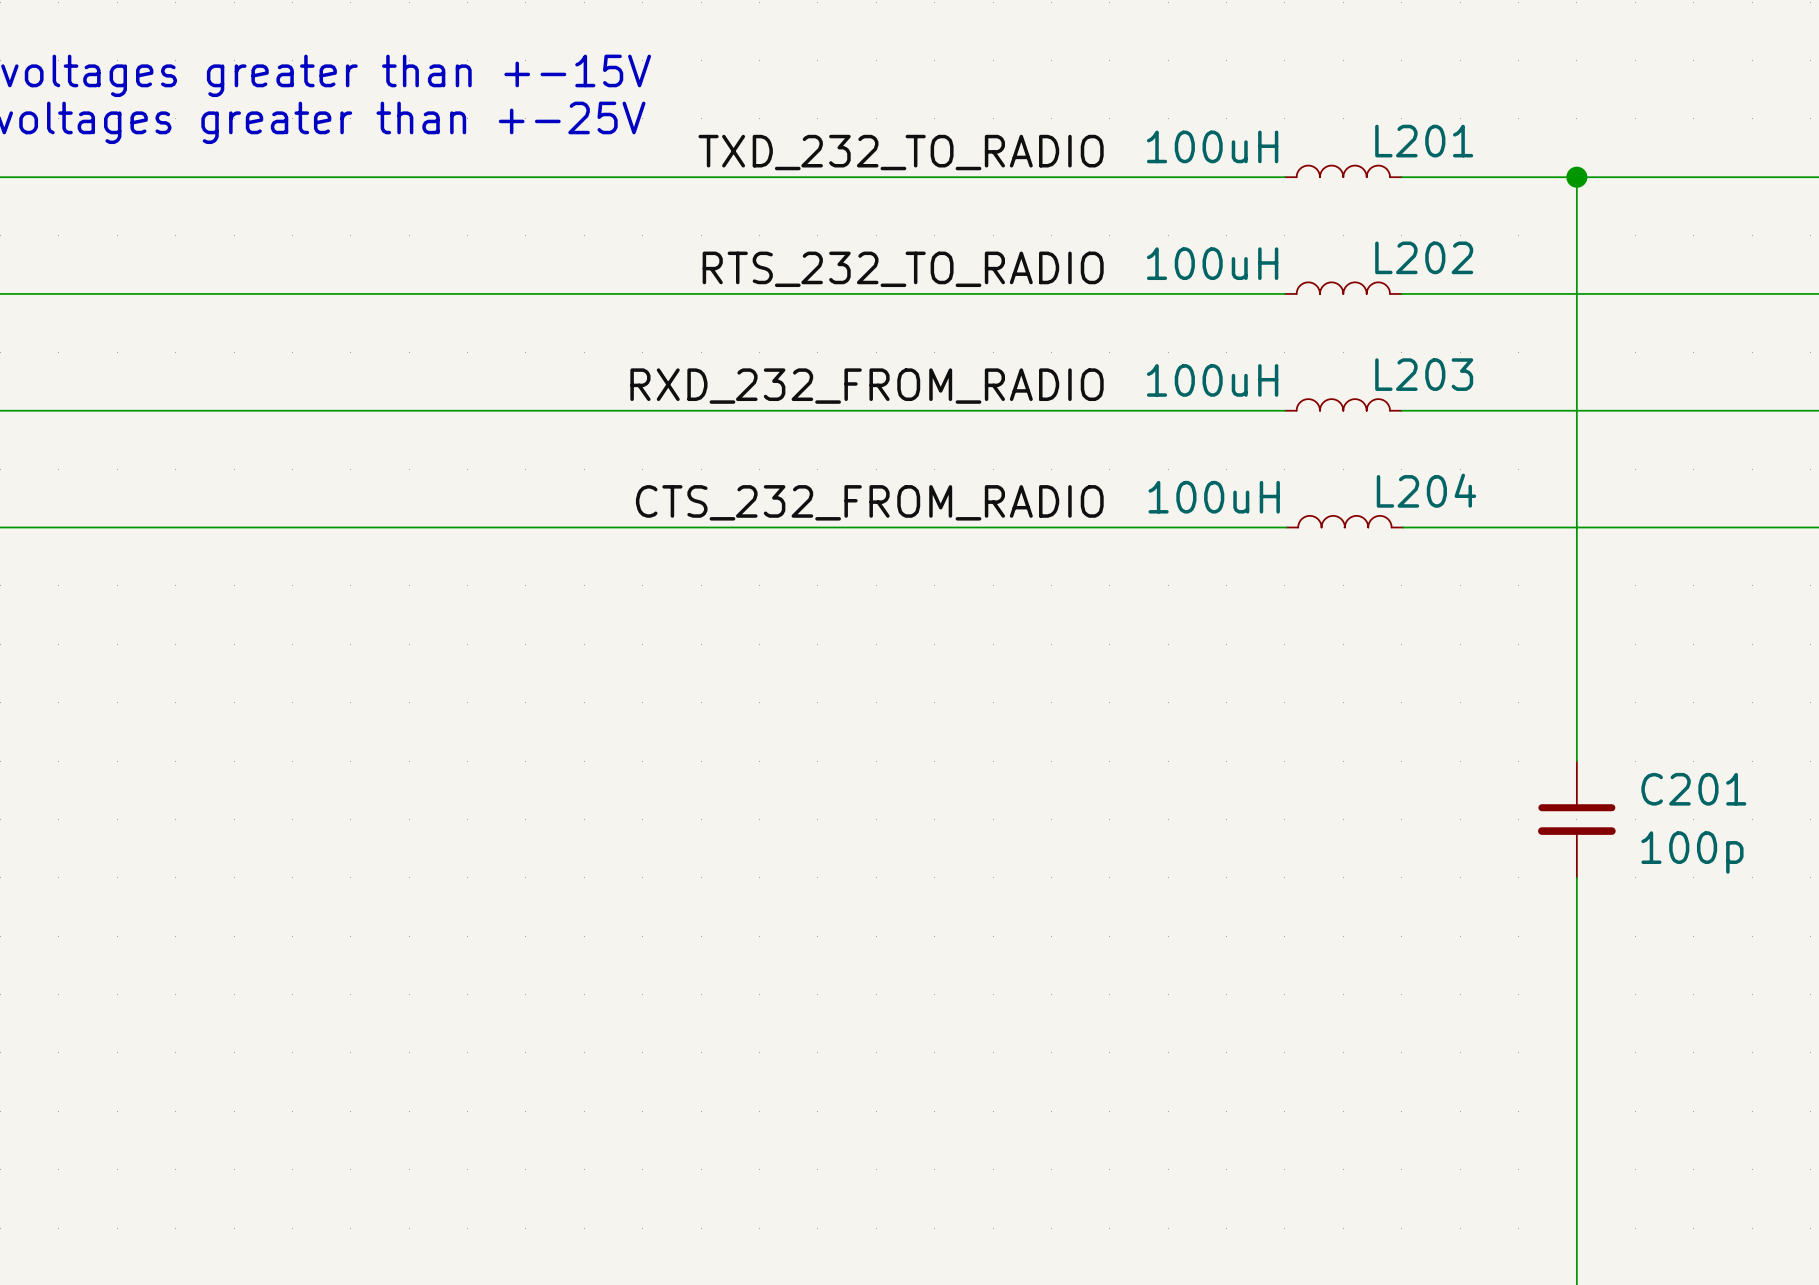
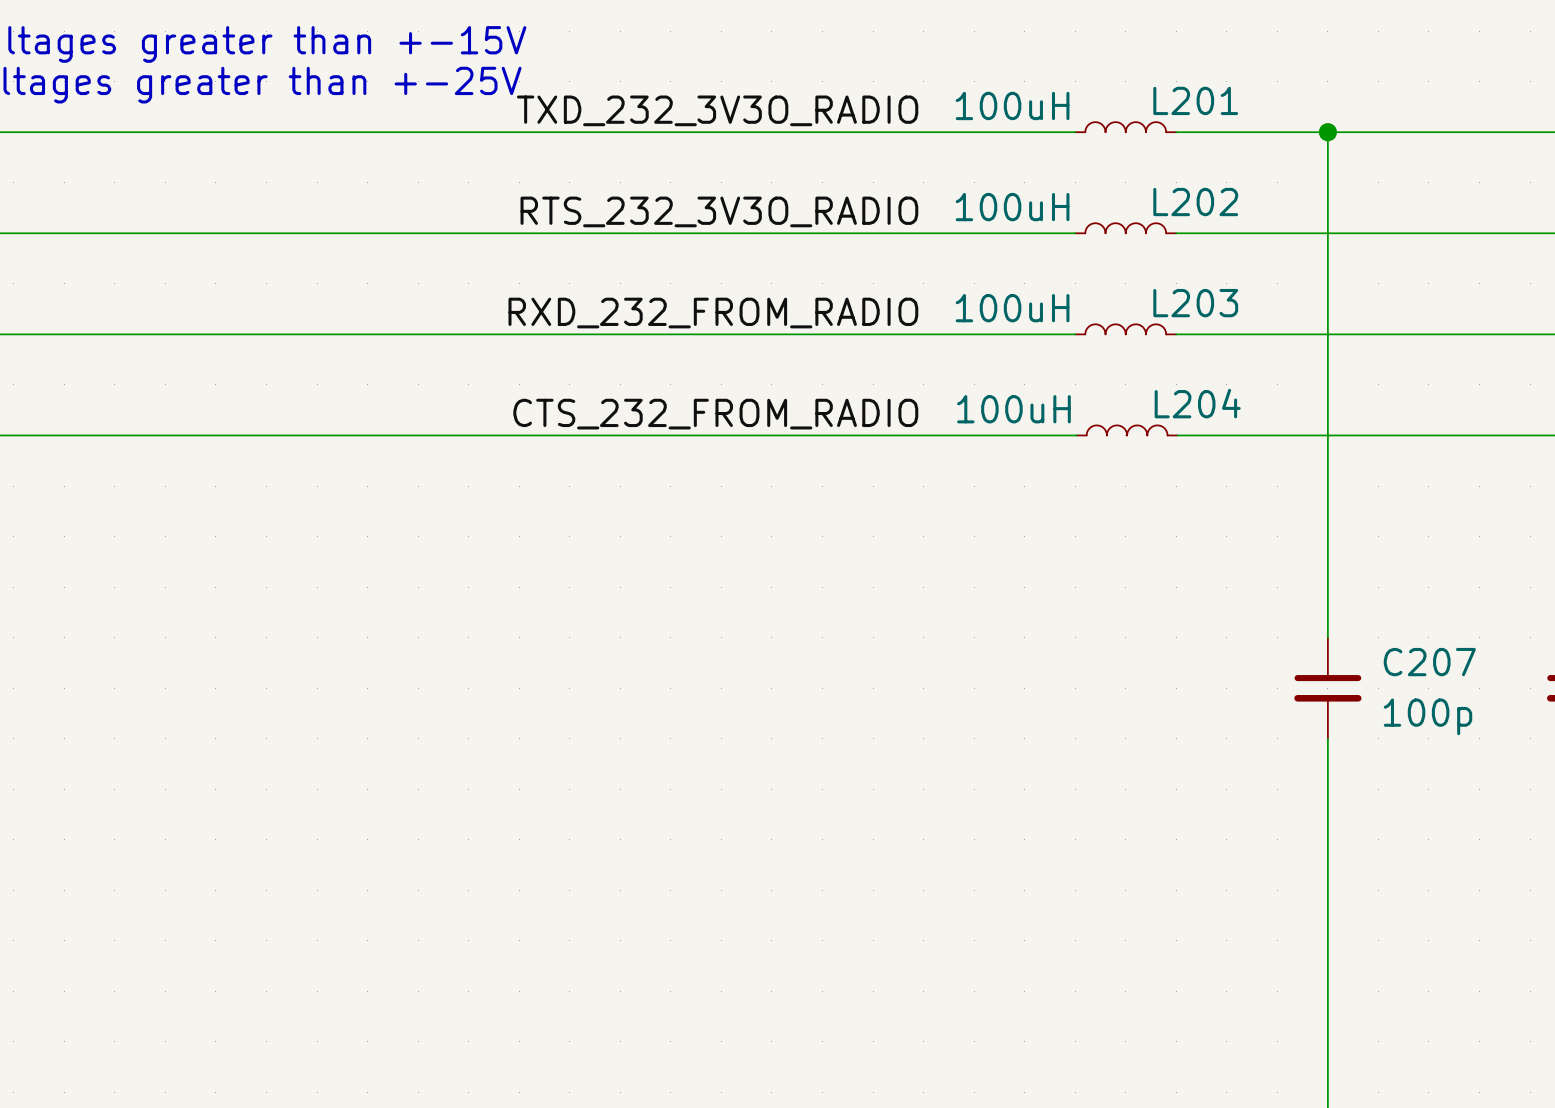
label: TXD_232_TO_RADIO (901, 152) -> TXD_232_3V3O_RADIO (717, 110)
label: RTS_232_TO_RADIO (903, 269) -> RTS_232_3V3O_RADIO (719, 211)
C201 name: C201 (1693, 789) -> C207 (1429, 662)

